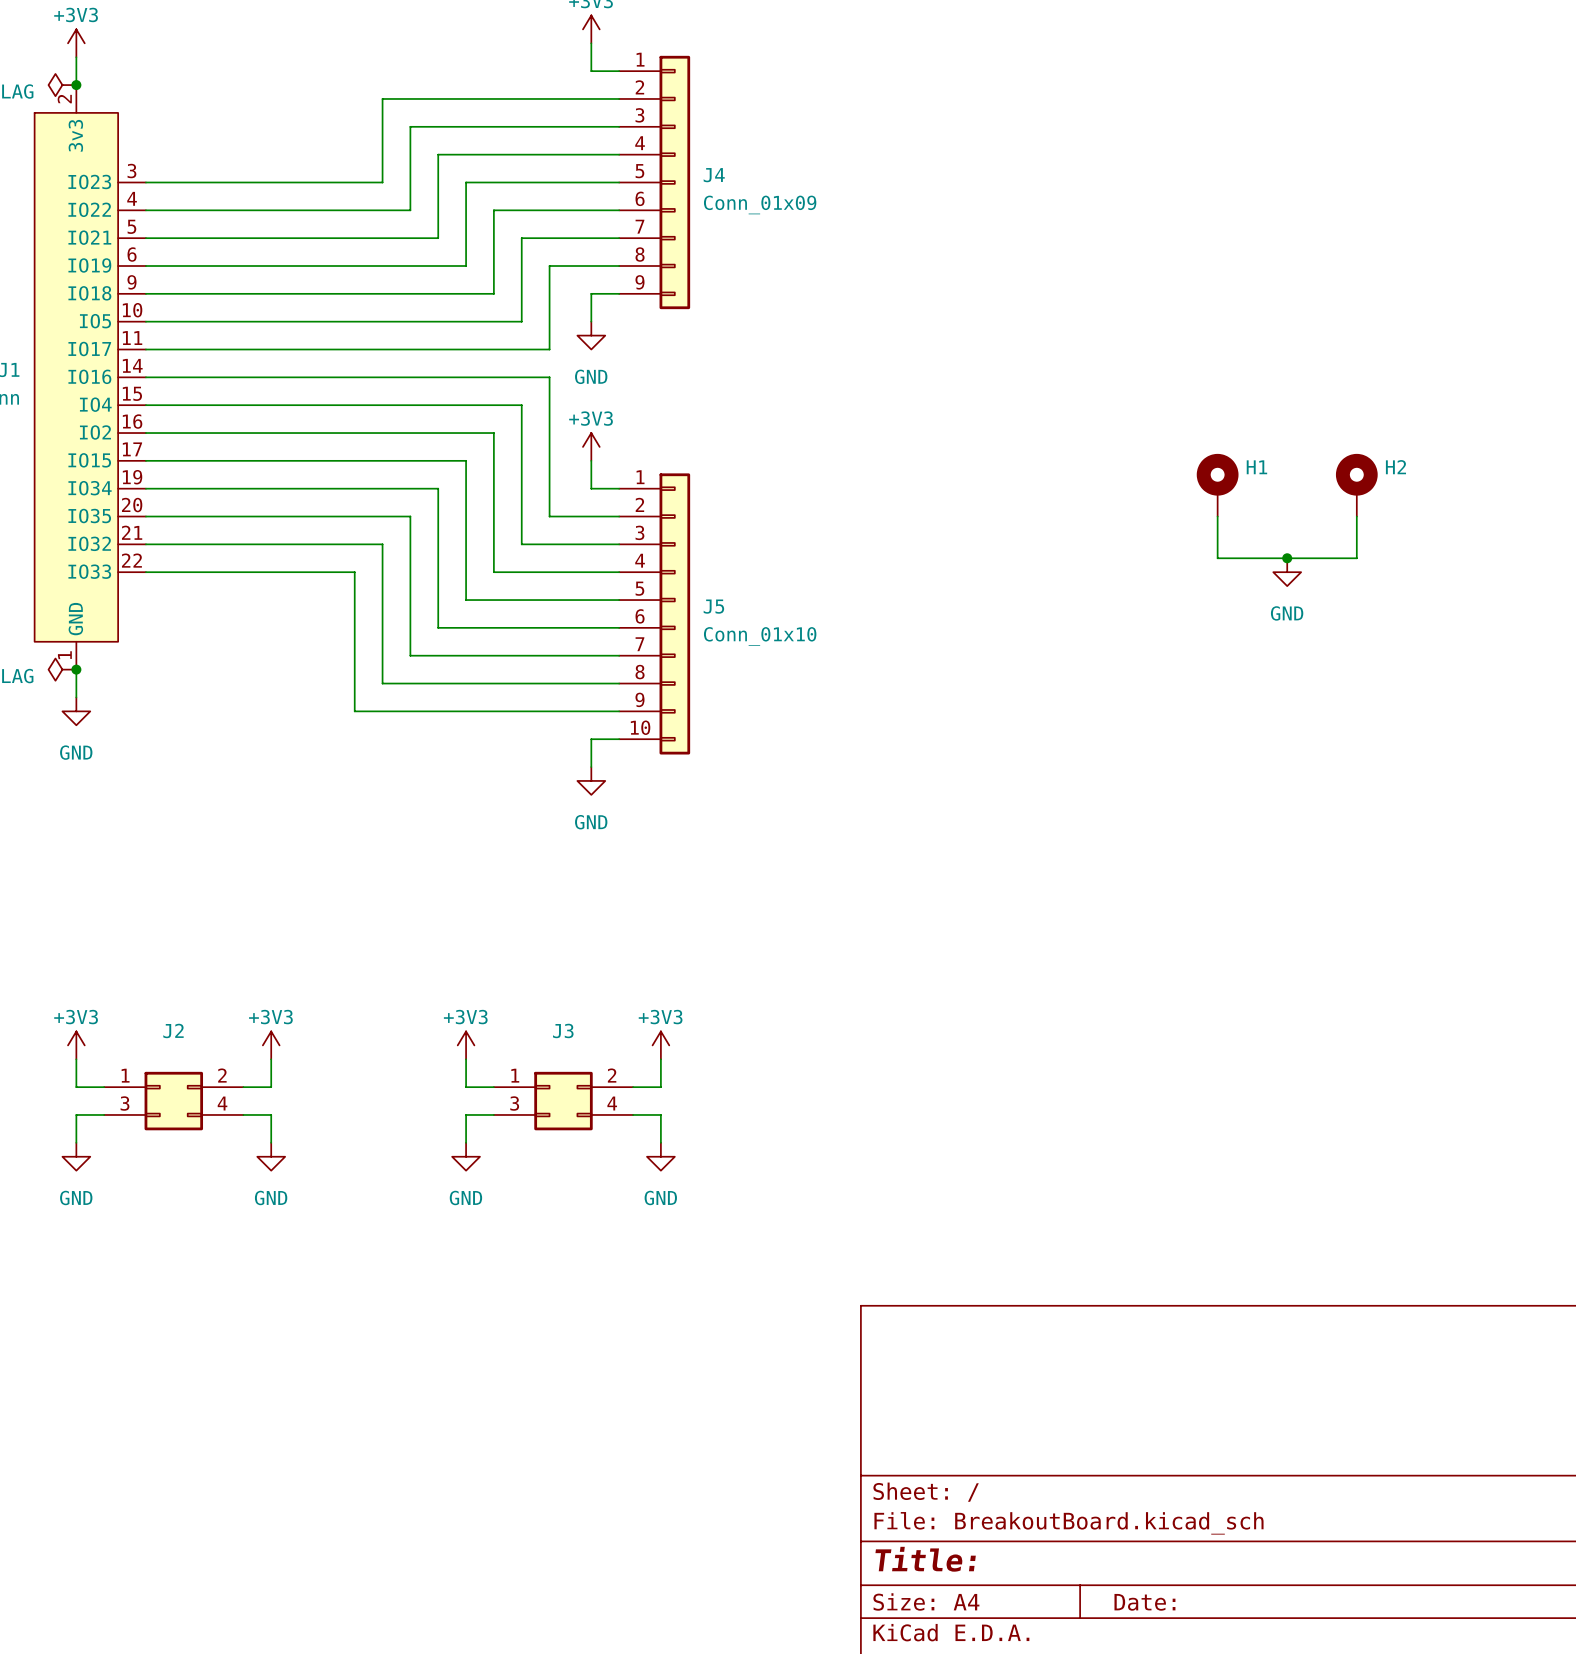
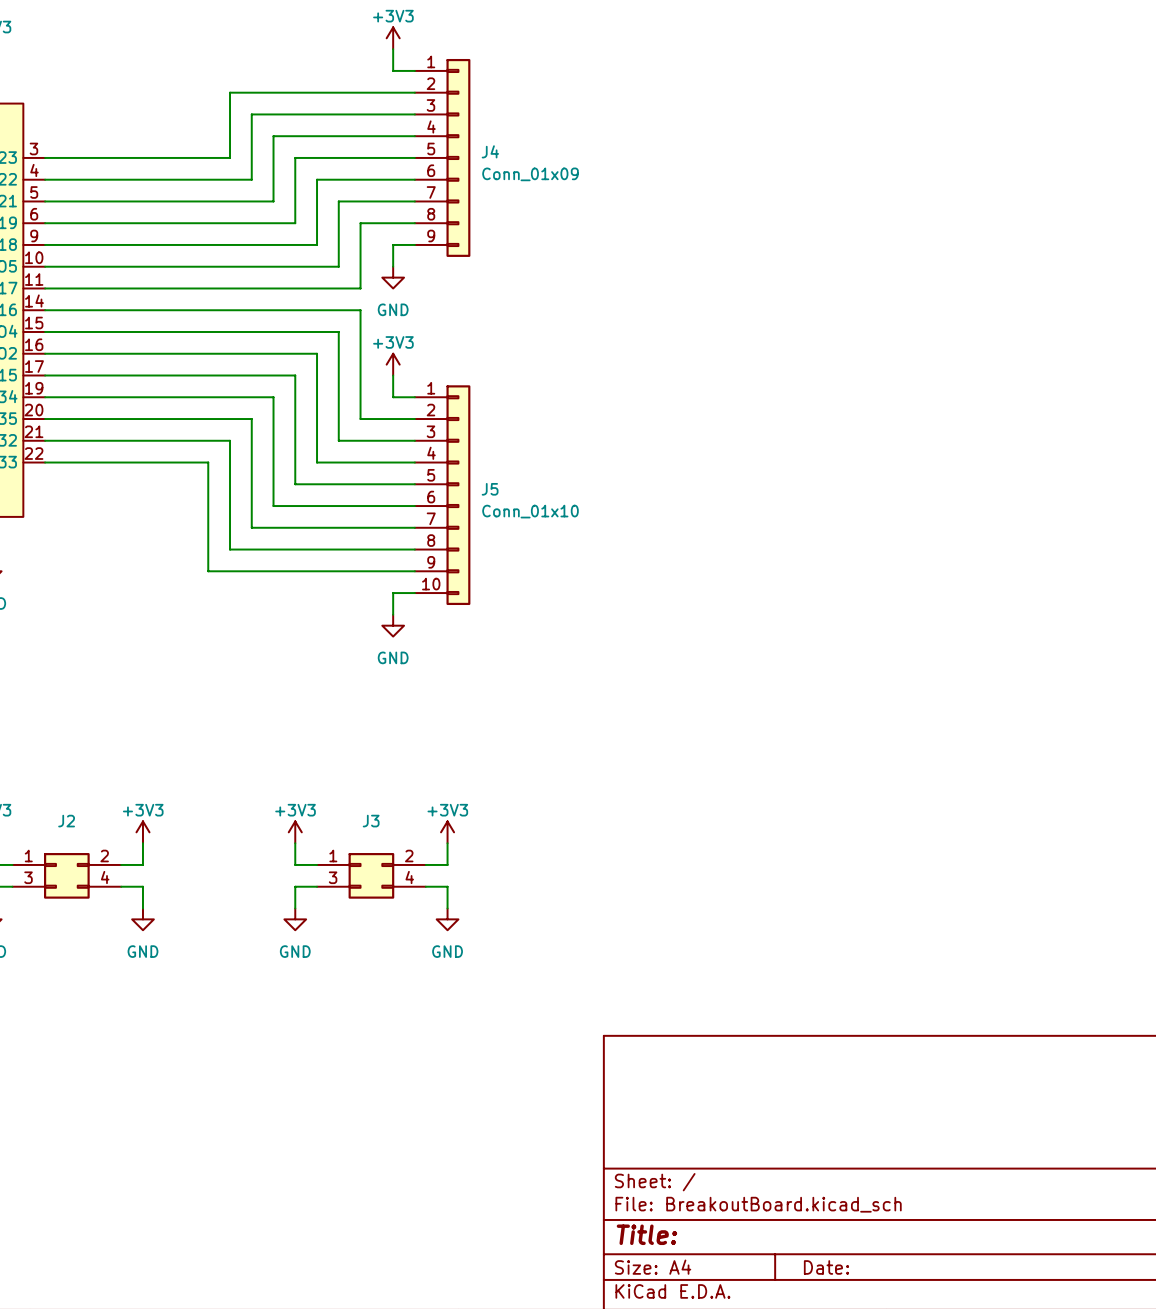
H1: (1217, 485) -> none
H2: (1356, 485) -> none
wire: (1217, 516) (1217, 558) (1356, 558) (1356, 516) -> none
junction: (1287, 558) -> none
power symbol: GND (1287, 572) -> none

